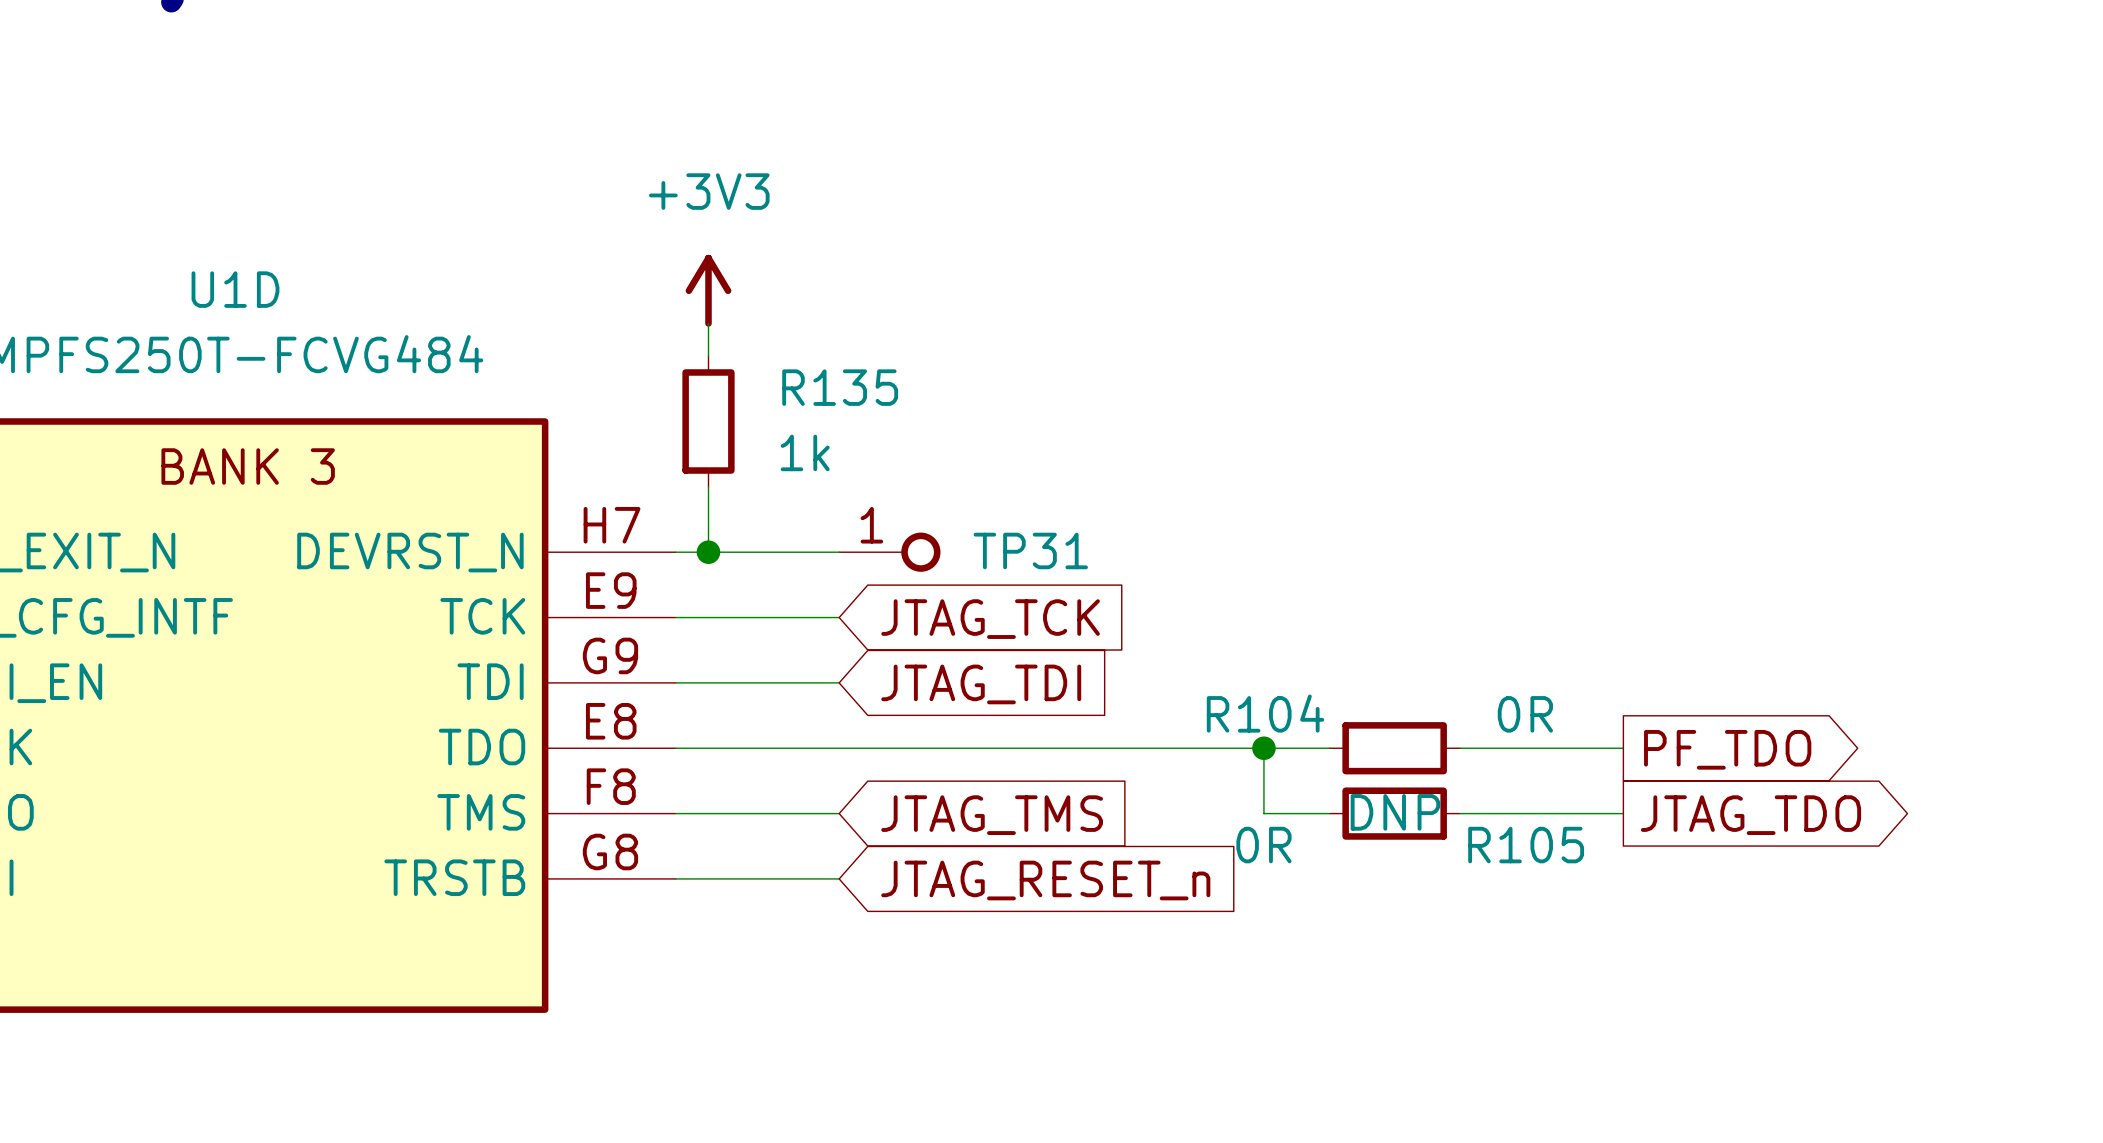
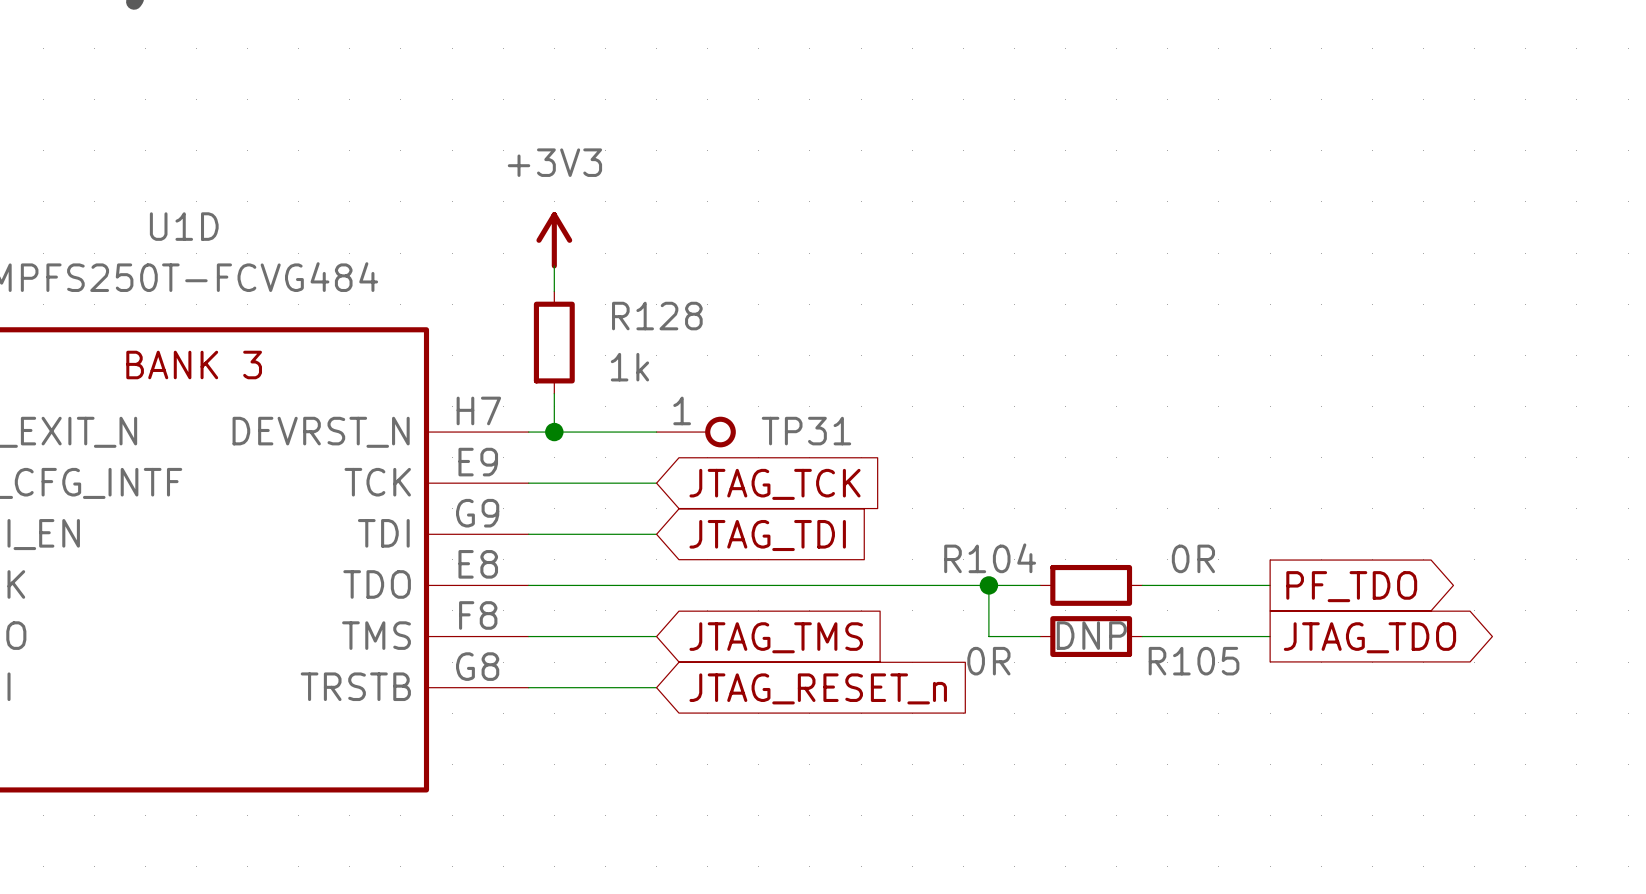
power symbol position: +3V3 (708, 290) -> +3V3 (554, 240)
R135 name: R135 (840, 387) -> R128 (657, 316)
R135 position: (708, 421) -> (554, 342)

